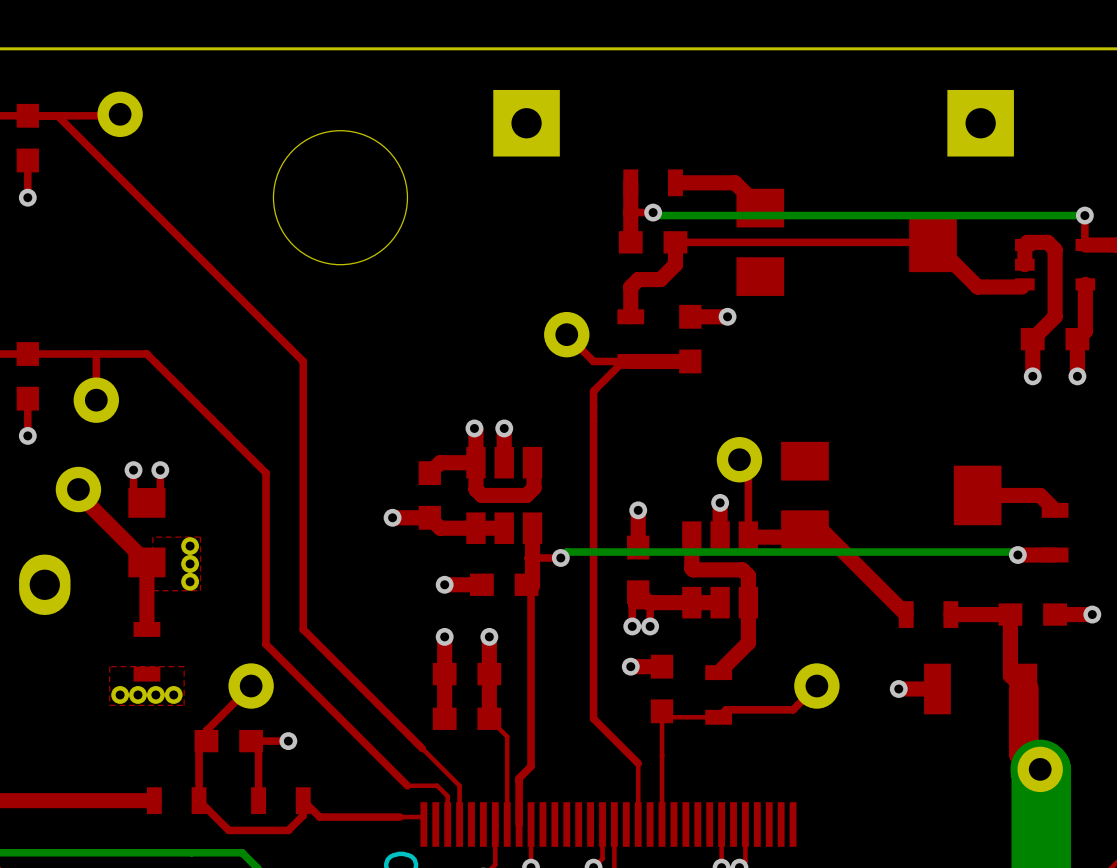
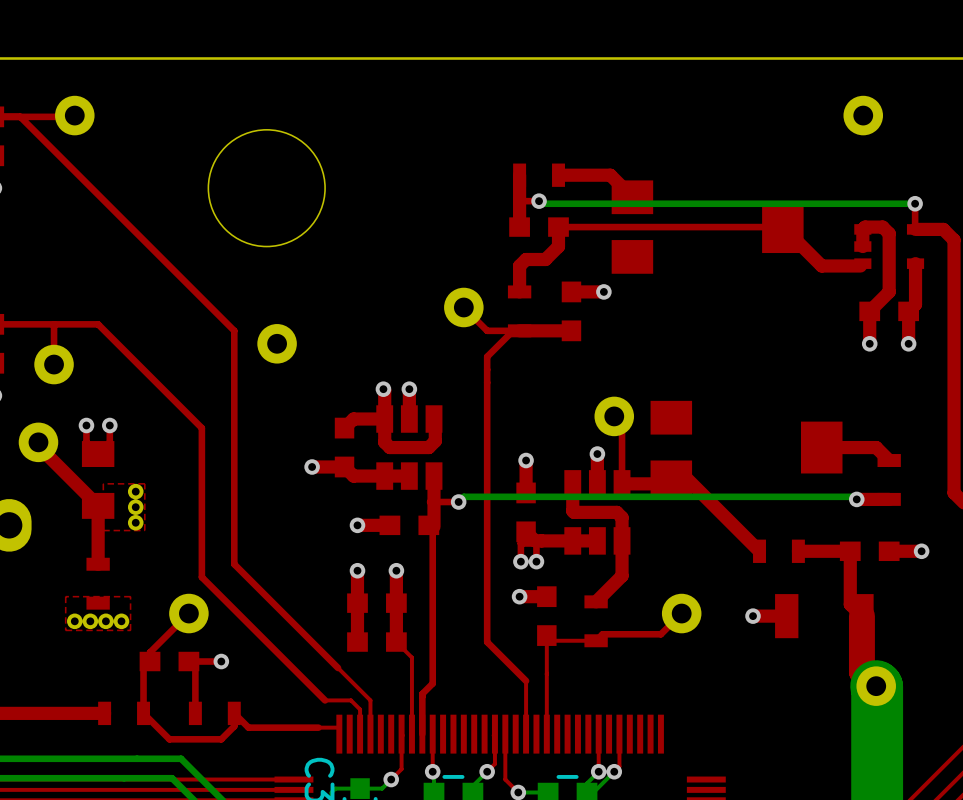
part: none -> (863, 115)
part: (526, 123) -> none
part: (980, 123) -> none
part: none -> (277, 343)

